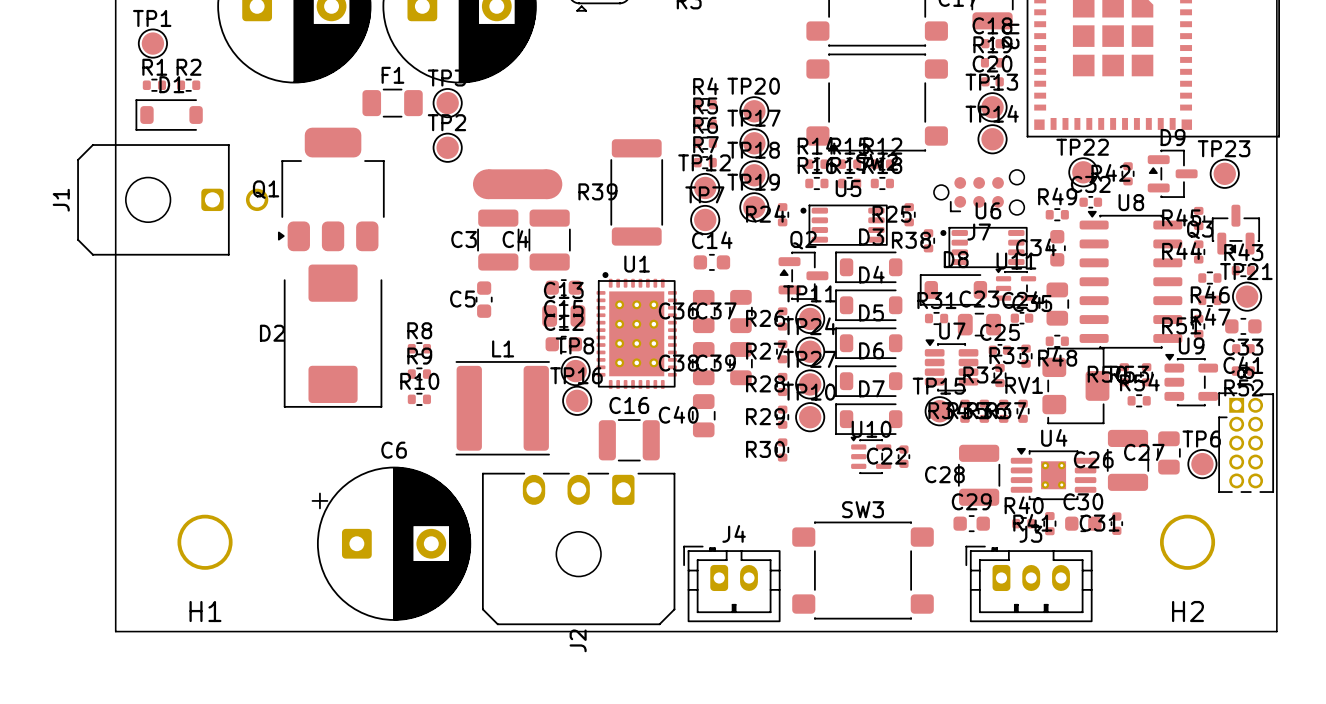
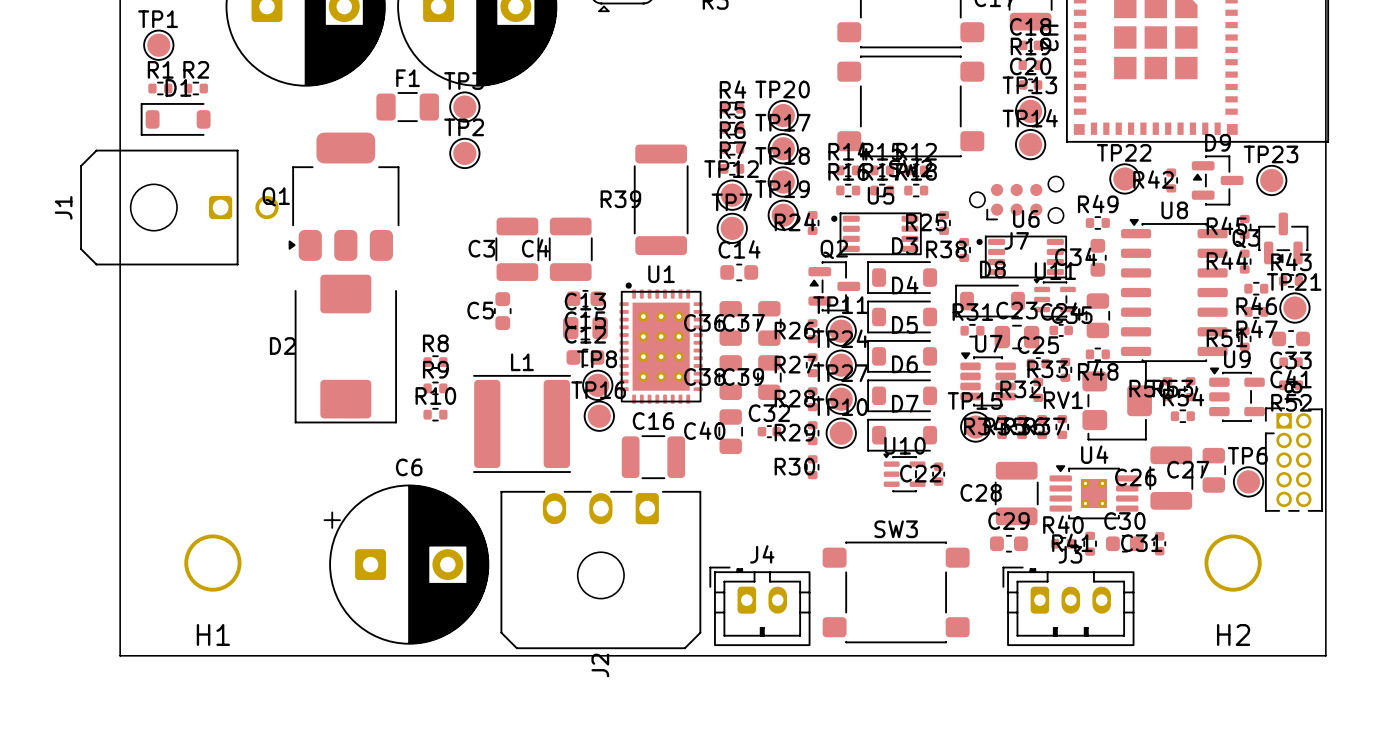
part: (517, 184) -> none
C32 position: (1090, 202) -> (769, 431)

